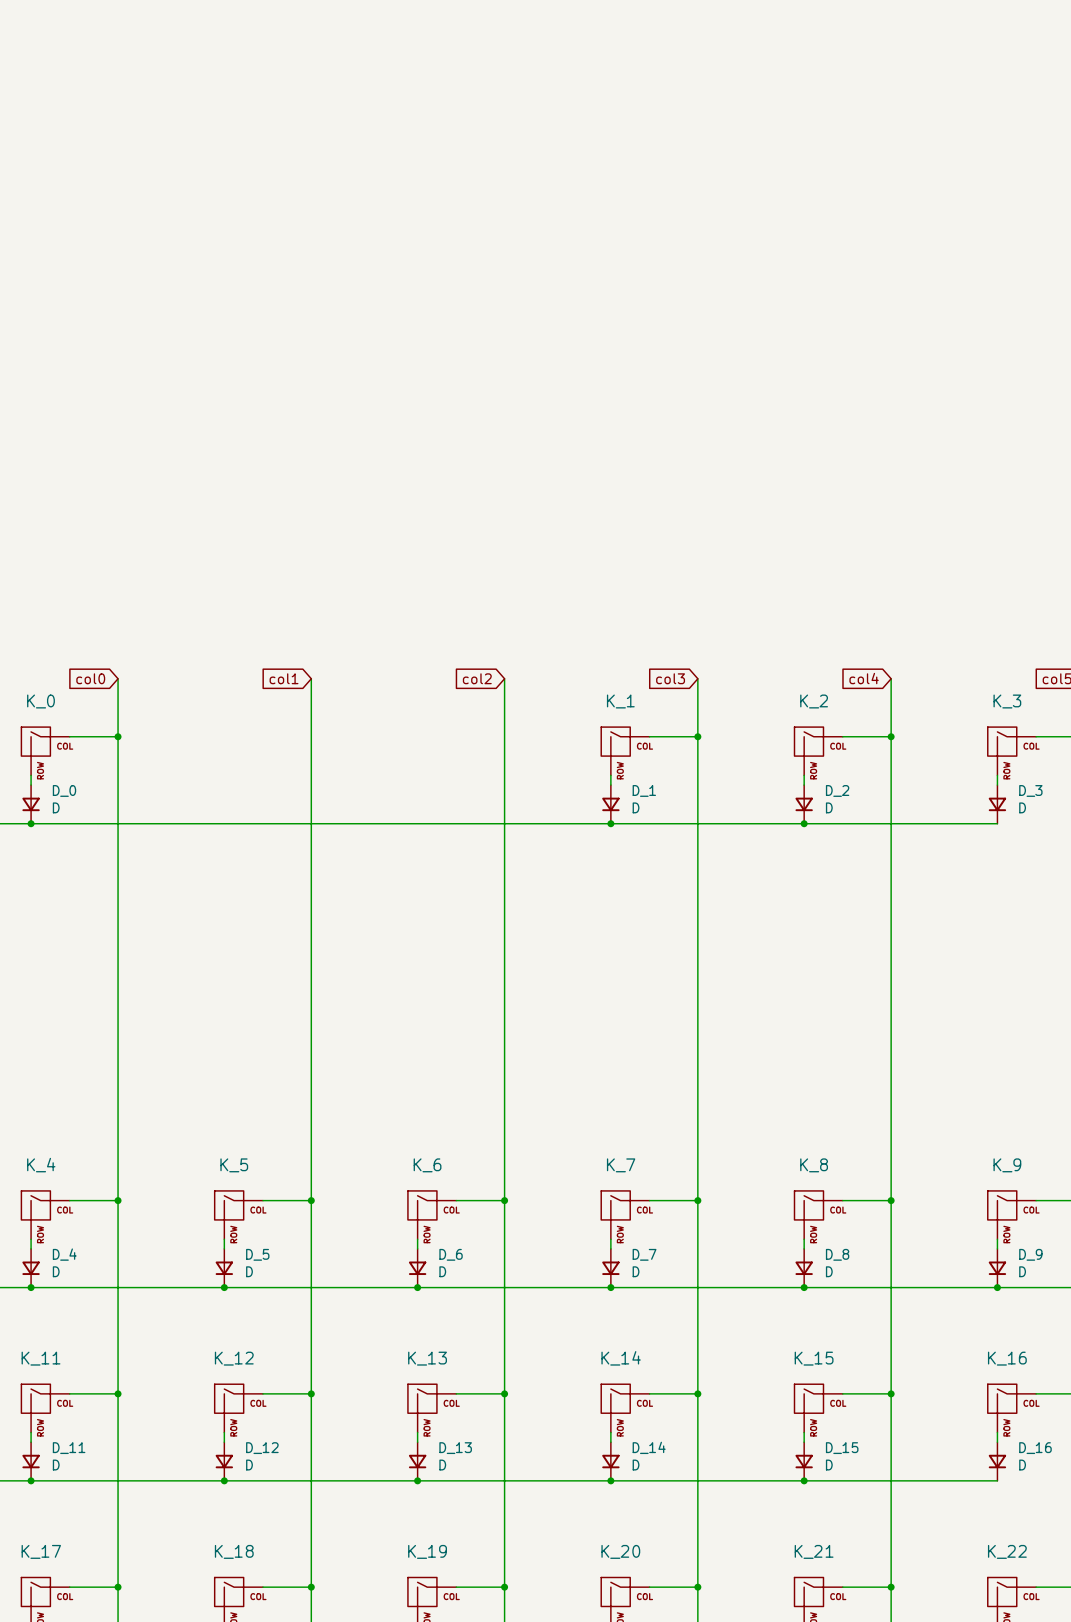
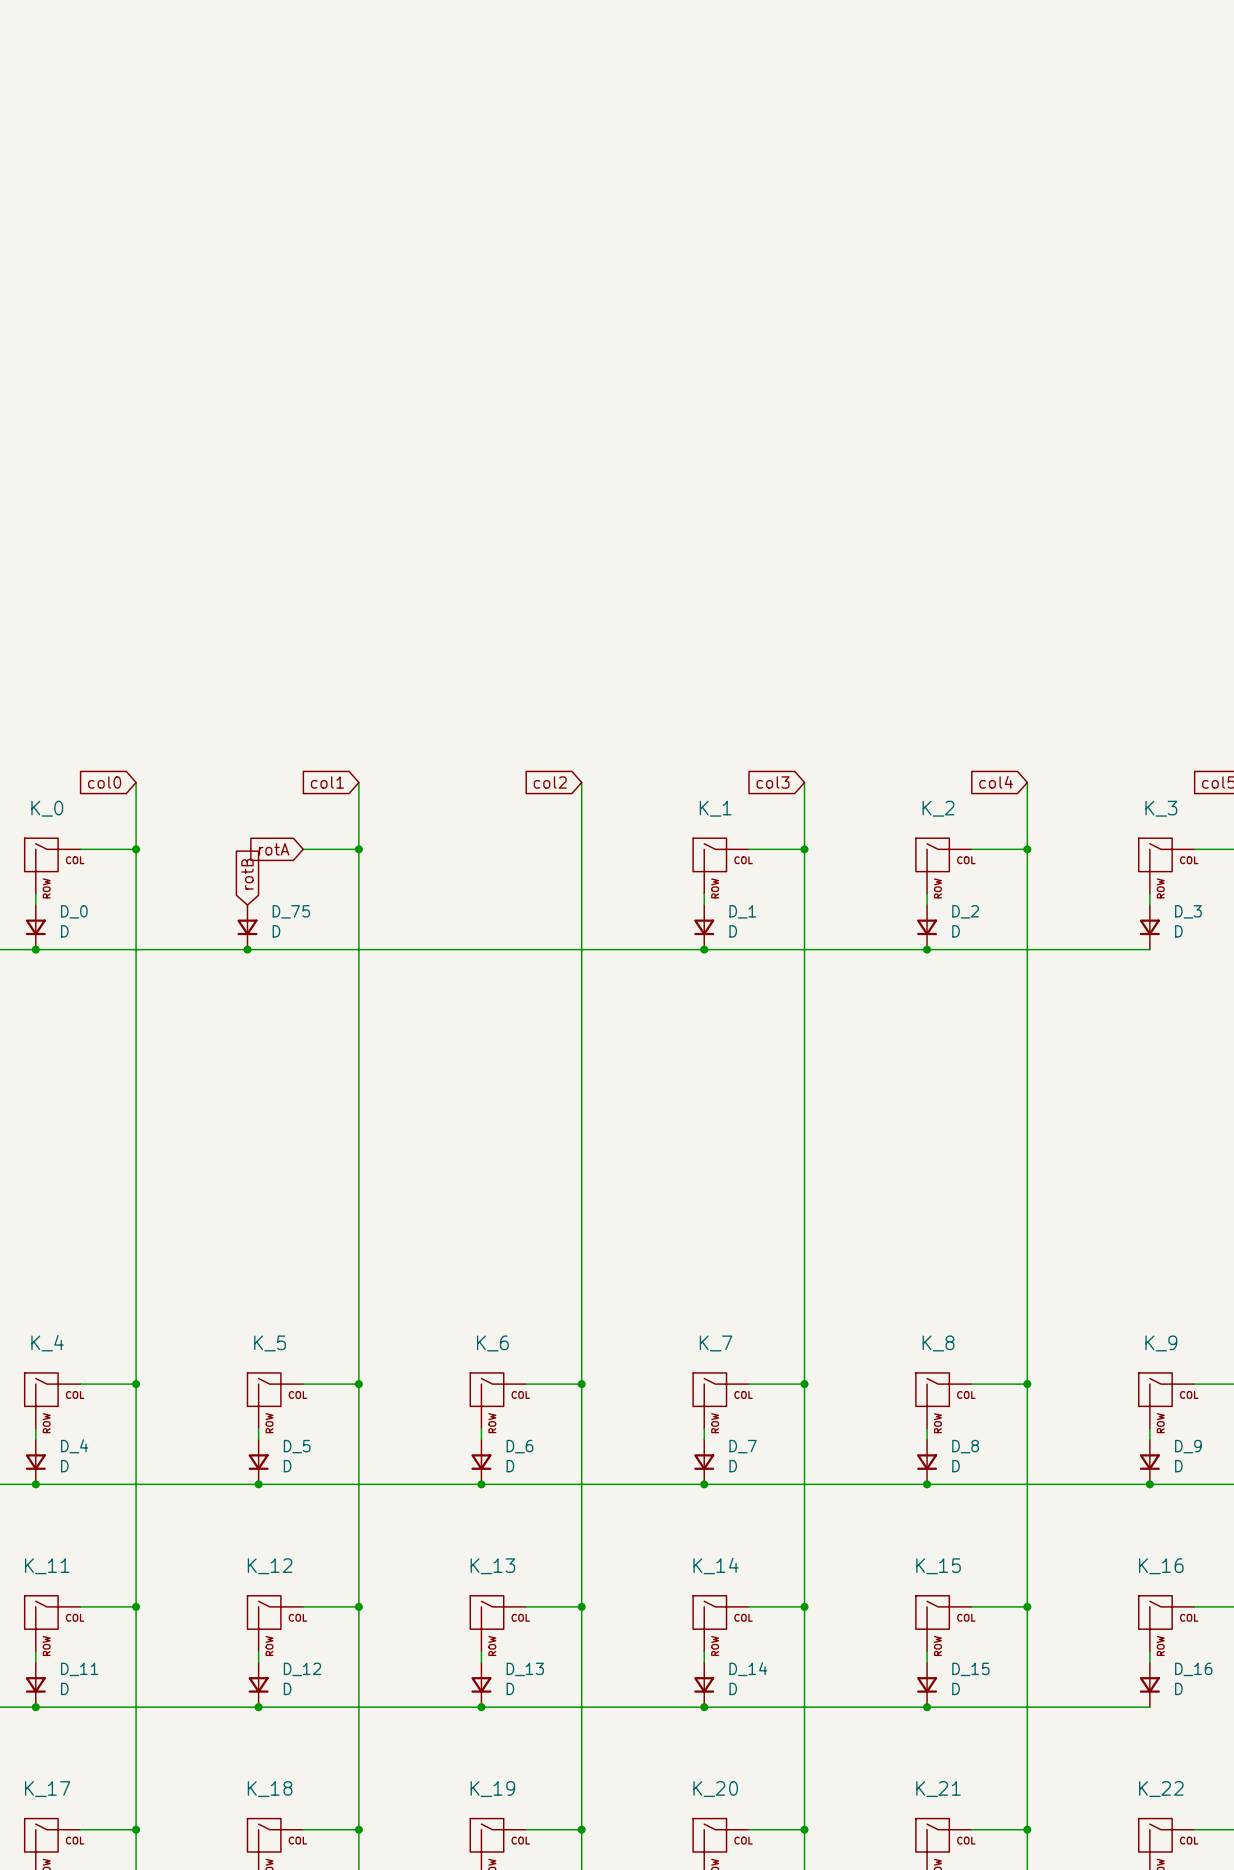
global label: none -> rotA (274, 849)
wire: none -> (303, 849) (358, 849)
junction: none -> (358, 849)
global label: none -> rotB (247, 874)
D_75: none -> D (247, 927)
junction: none -> (247, 949)

